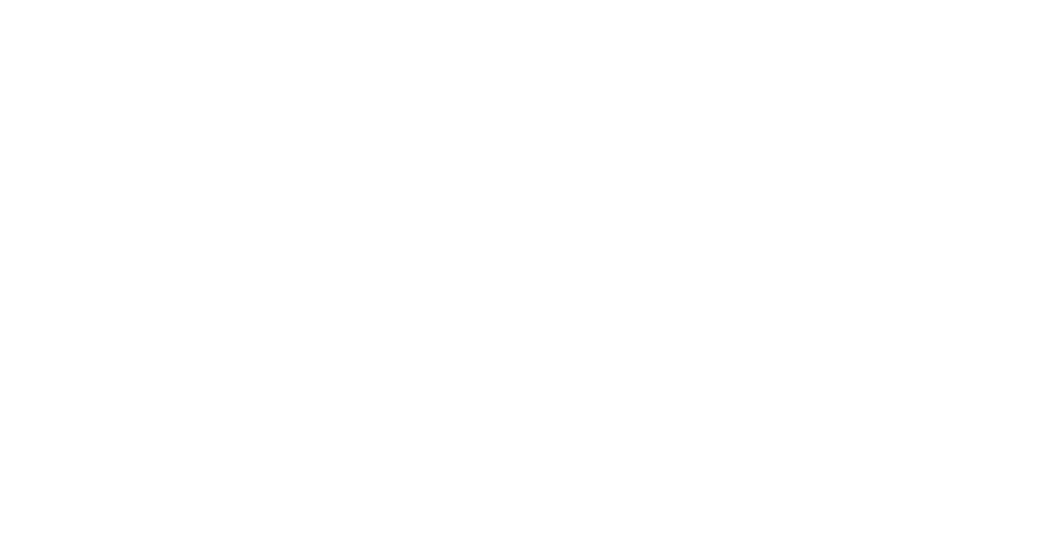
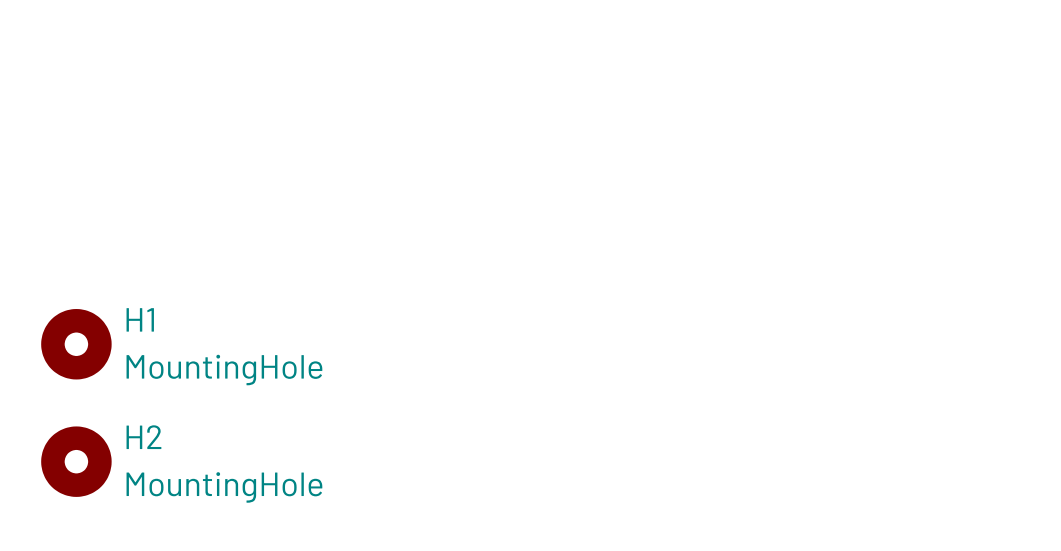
H1: none -> MountingHole (76, 344)
H2: none -> MountingHole (76, 461)

